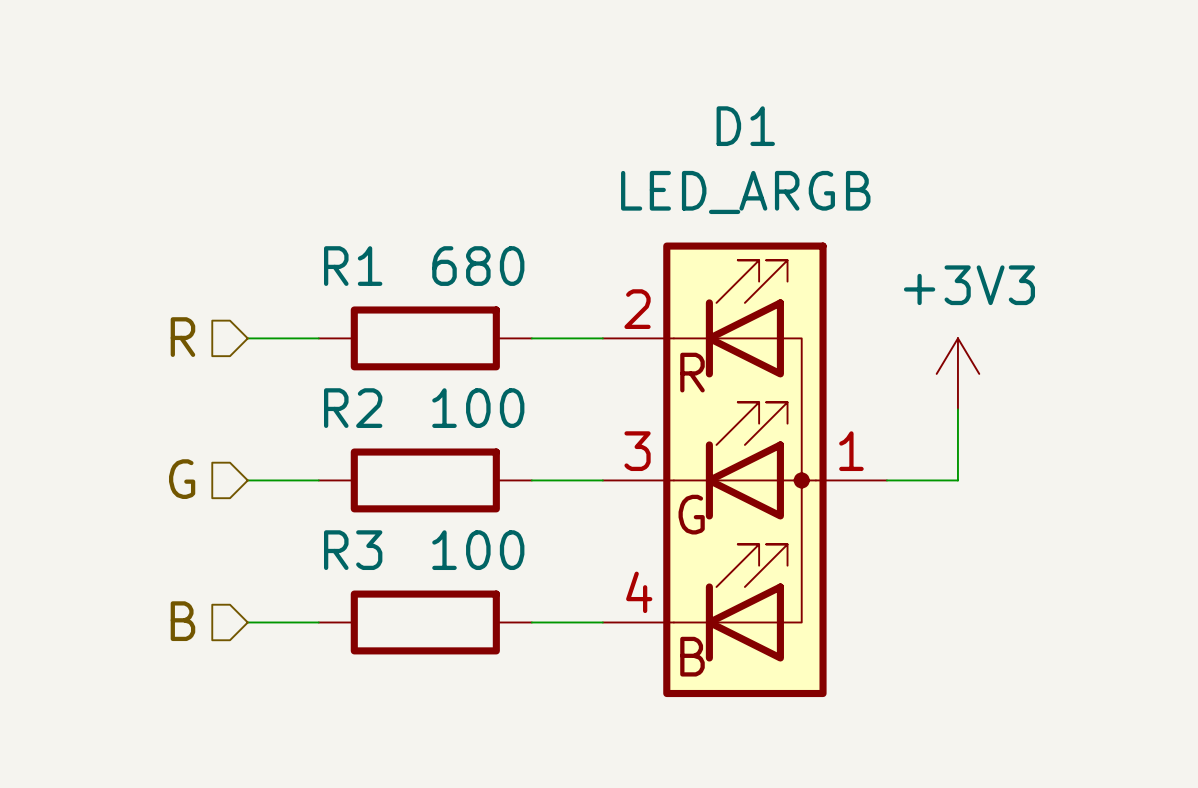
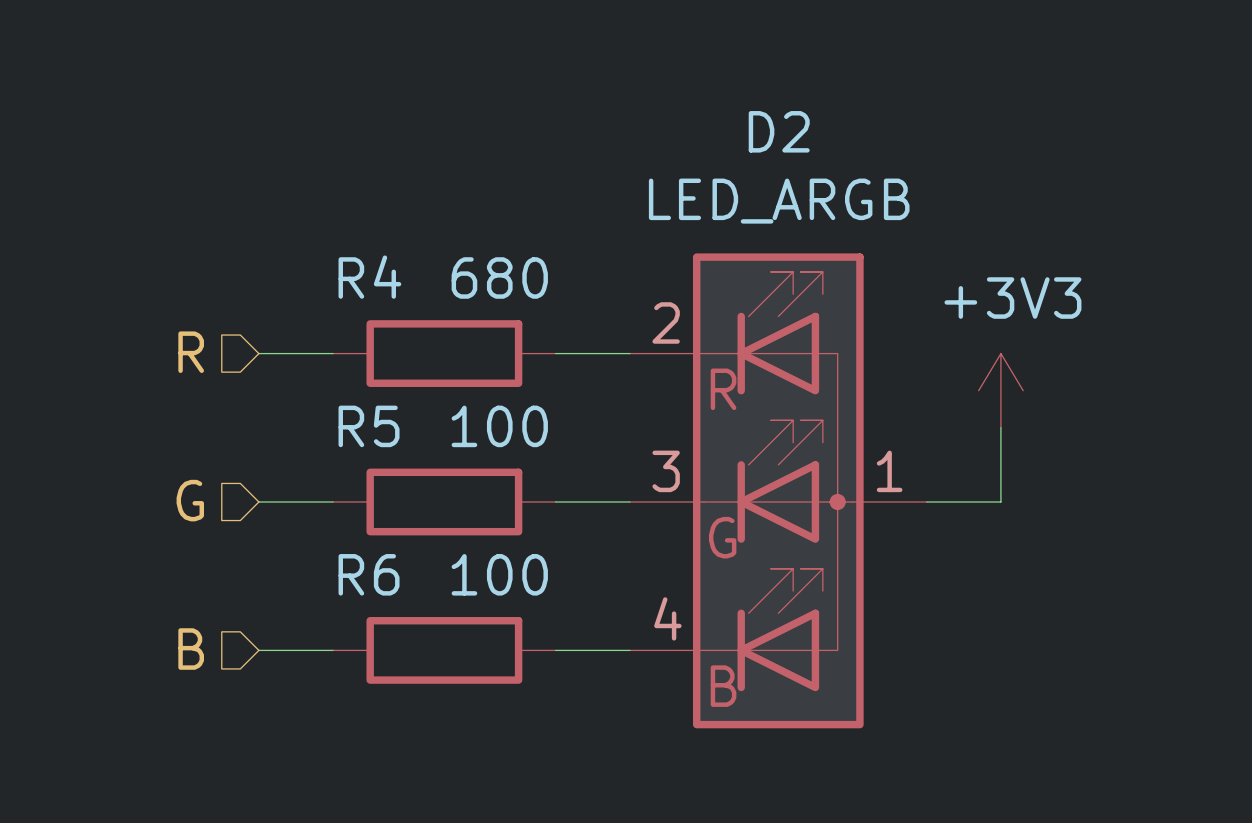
D1 name: D1 (745, 126) -> D2 (779, 131)
R1 name: R1 (353, 266) -> R4 (369, 277)
R2 name: R2 (353, 408) -> R5 (369, 426)
R3 name: R3 (353, 550) -> R6 (369, 574)

